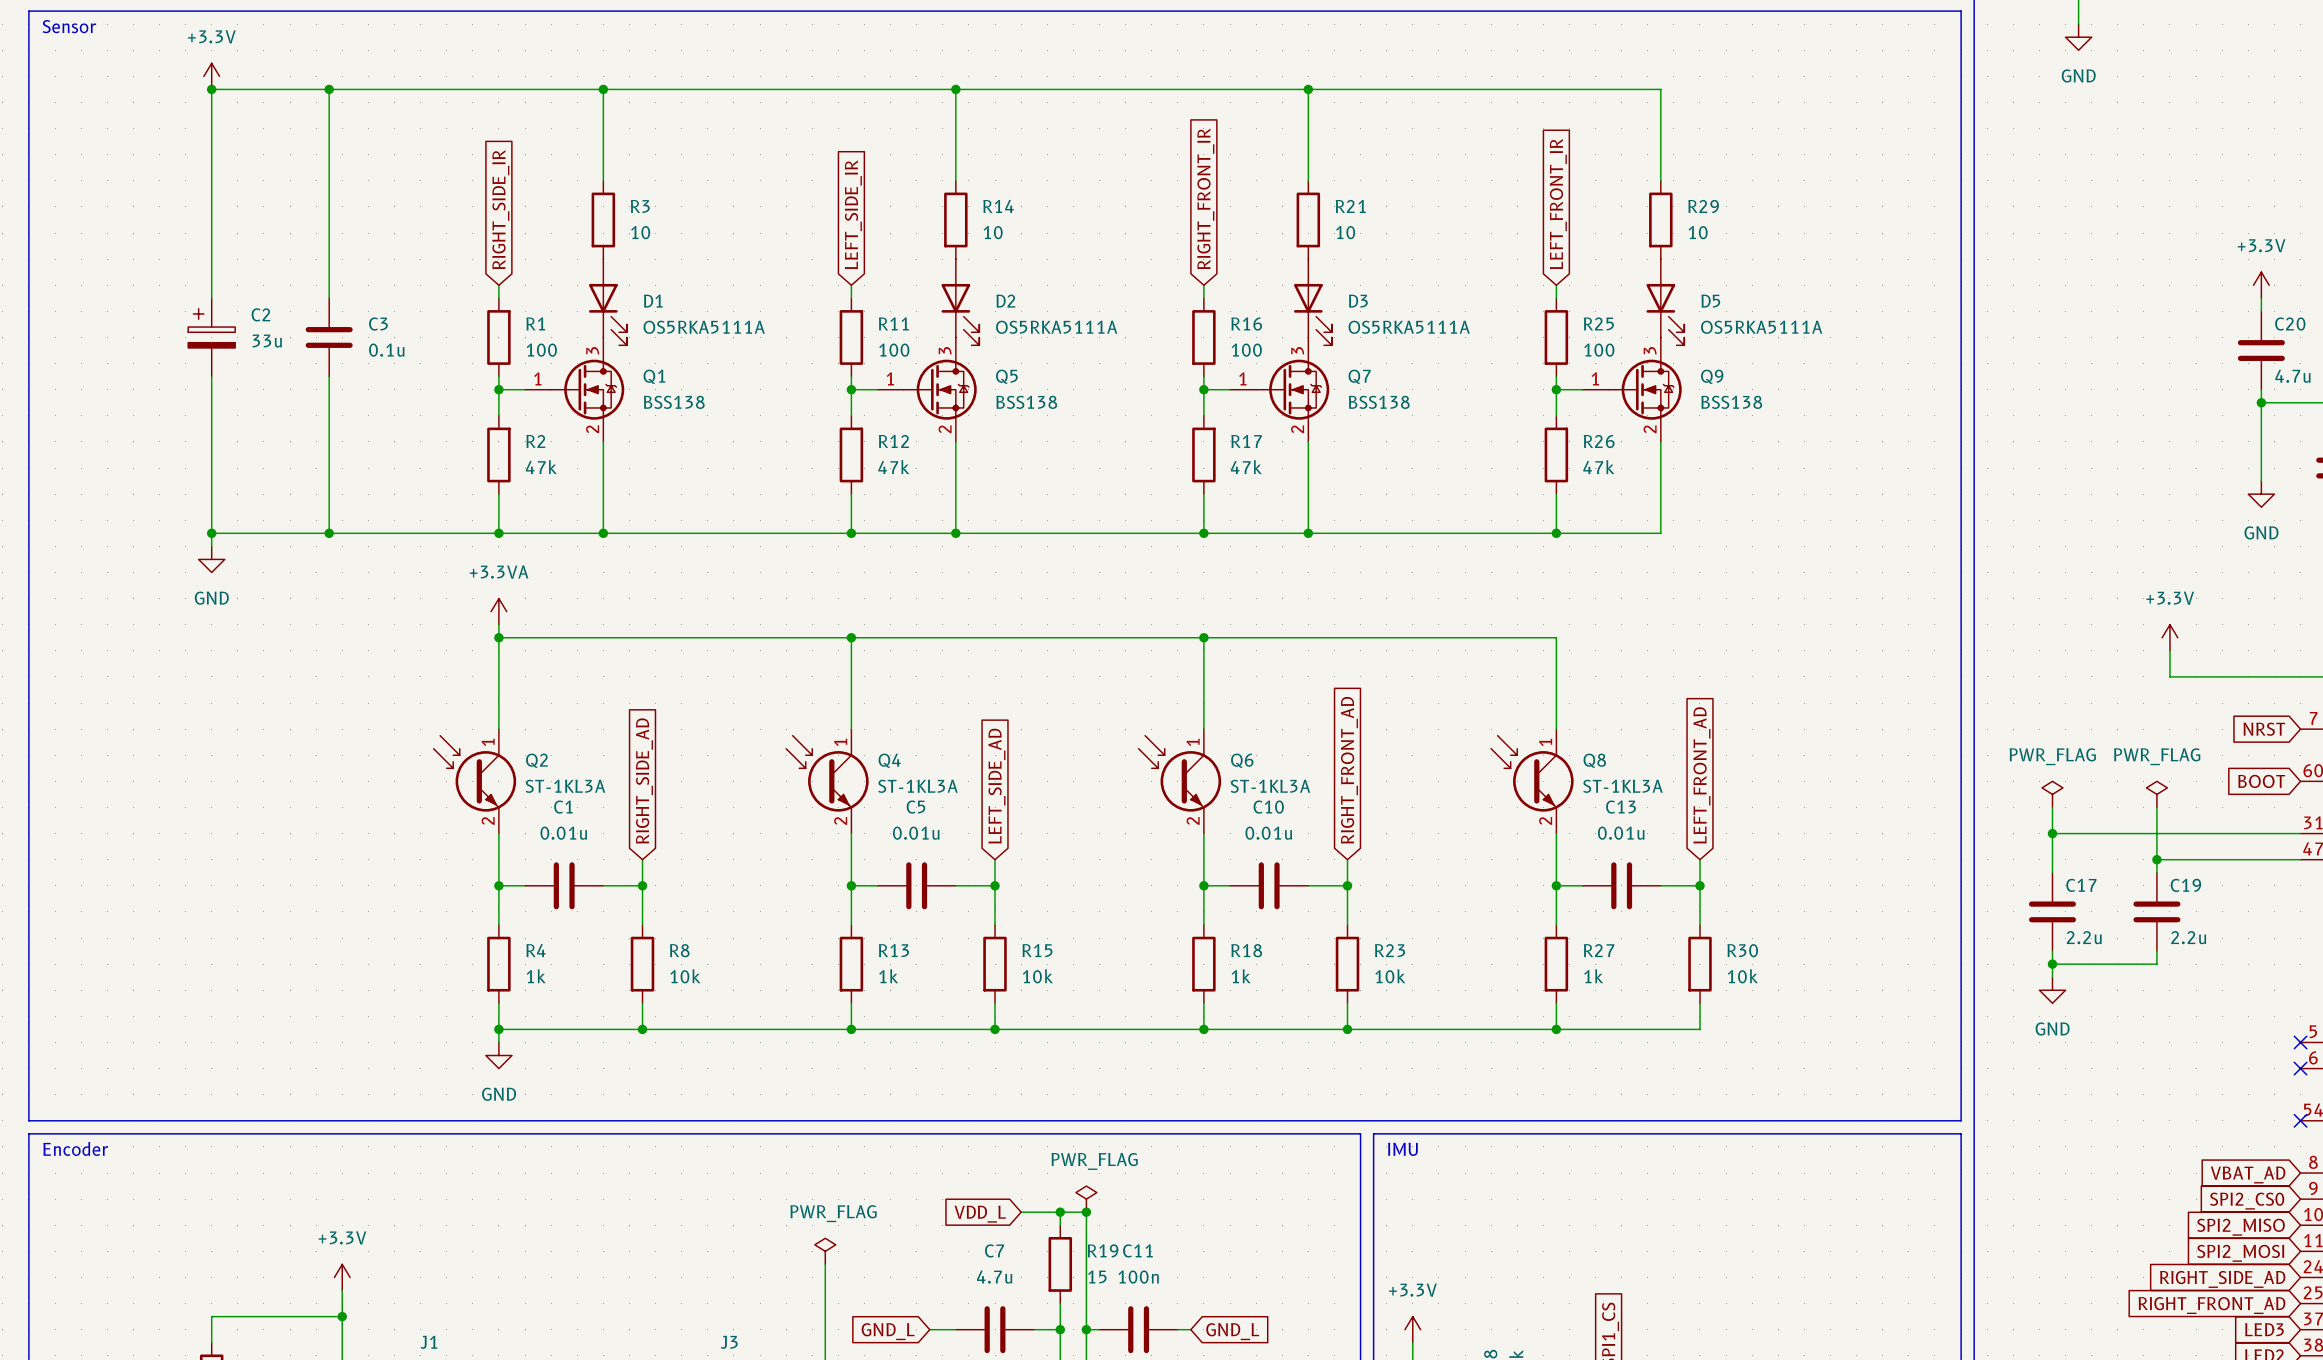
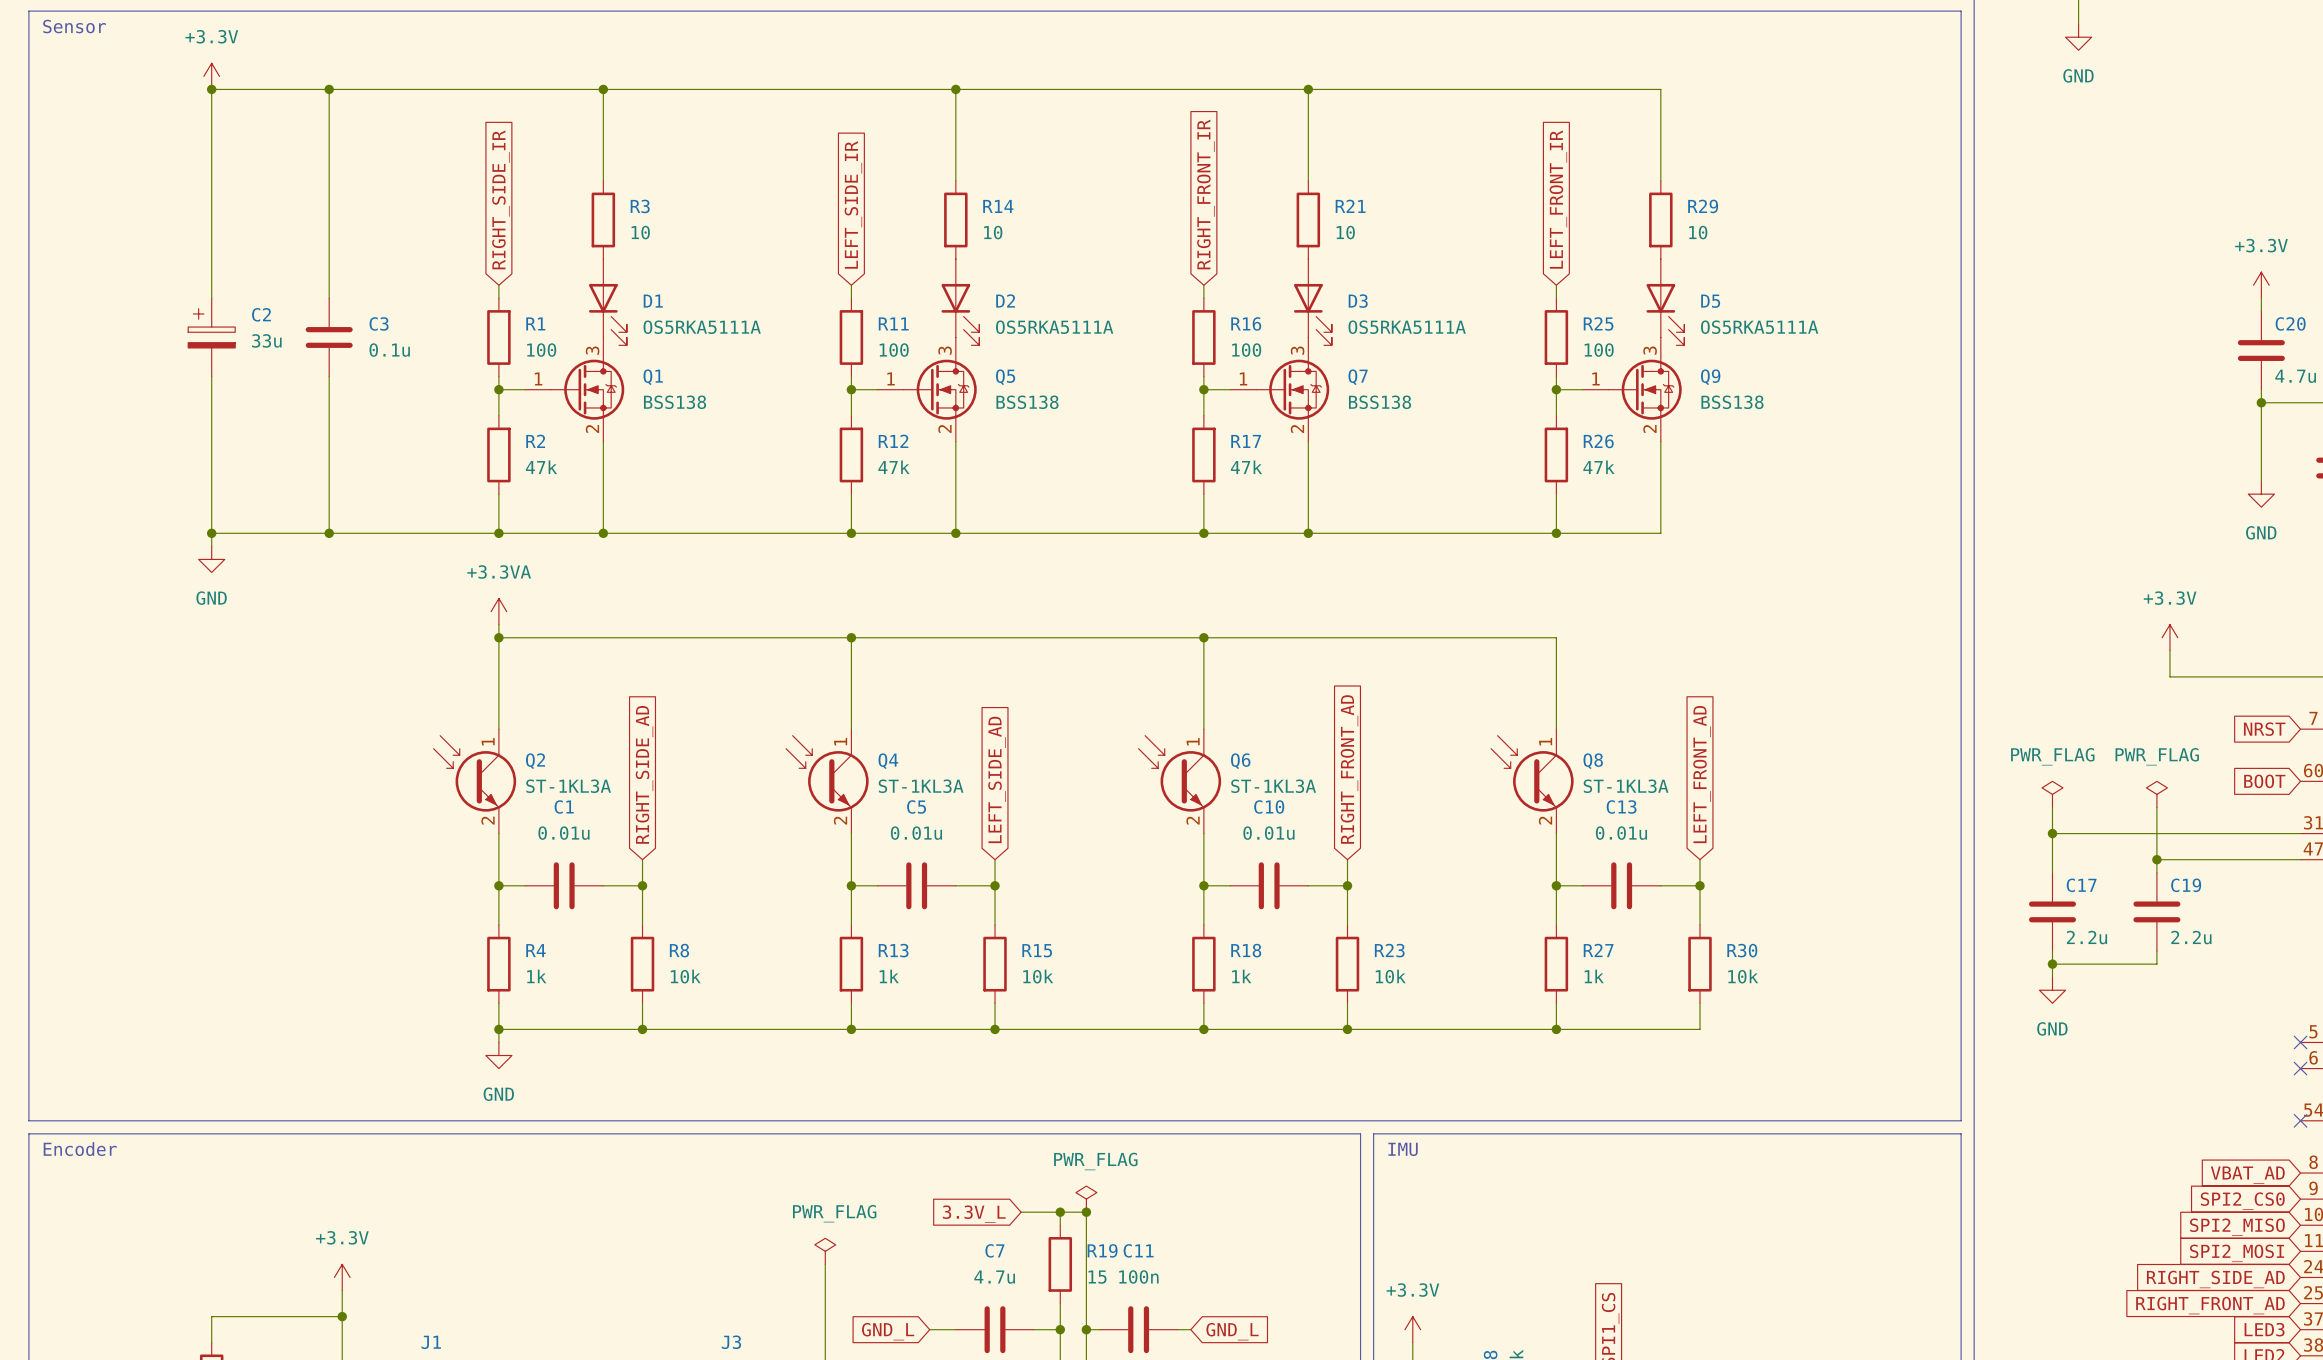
global label: VDD_L (980, 1214) -> 3.3V_L (974, 1214)

